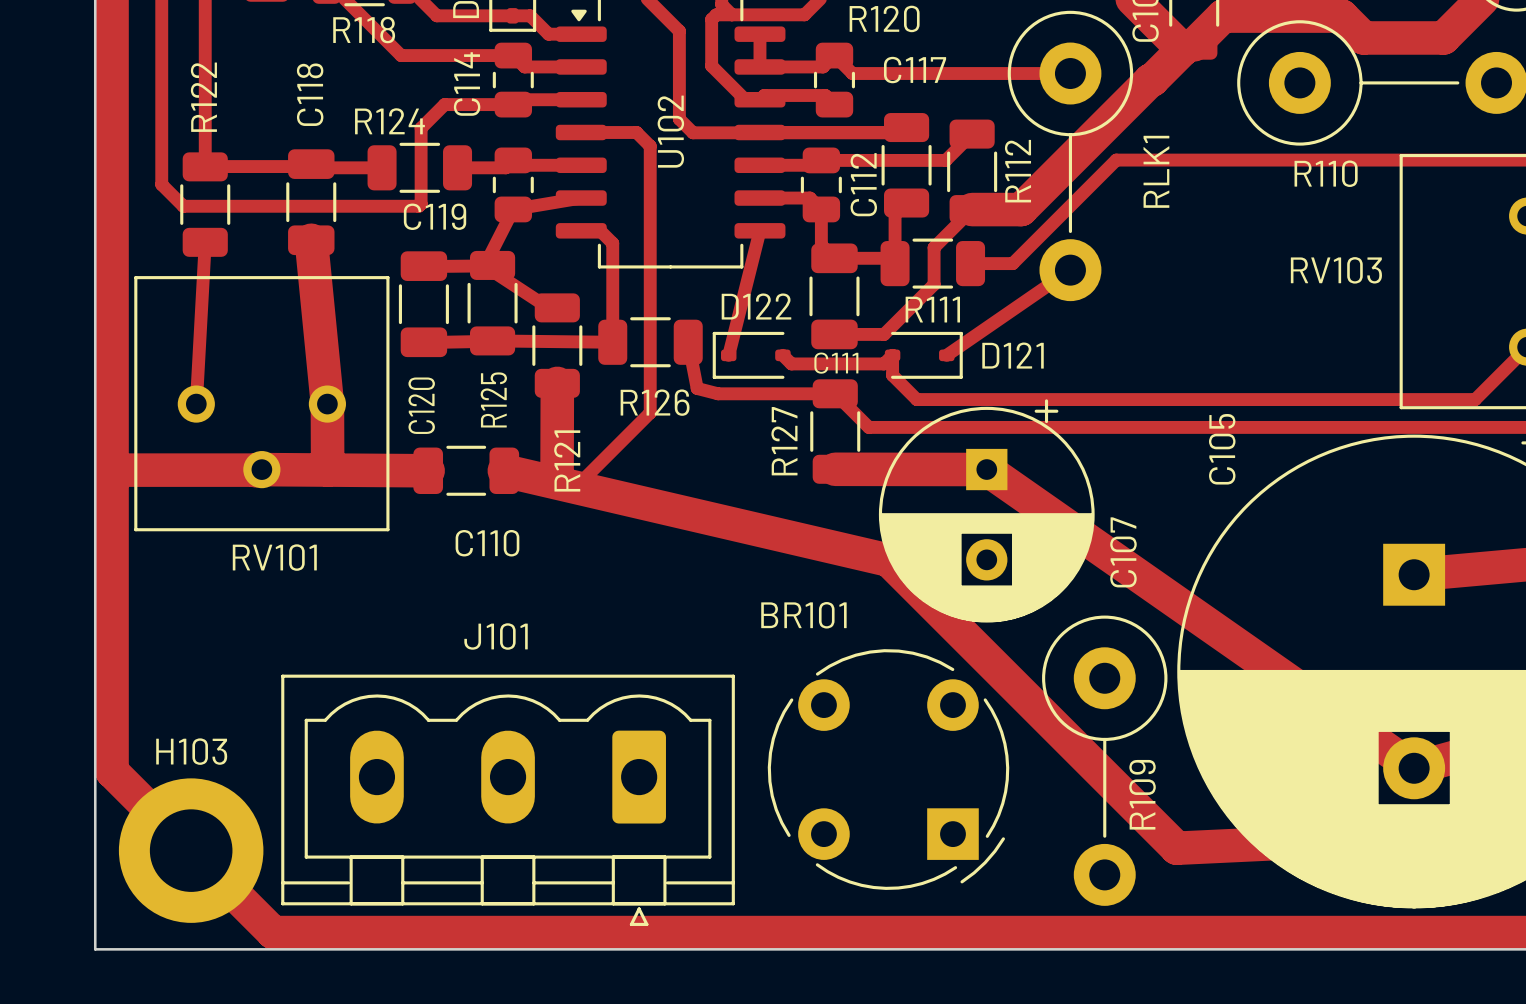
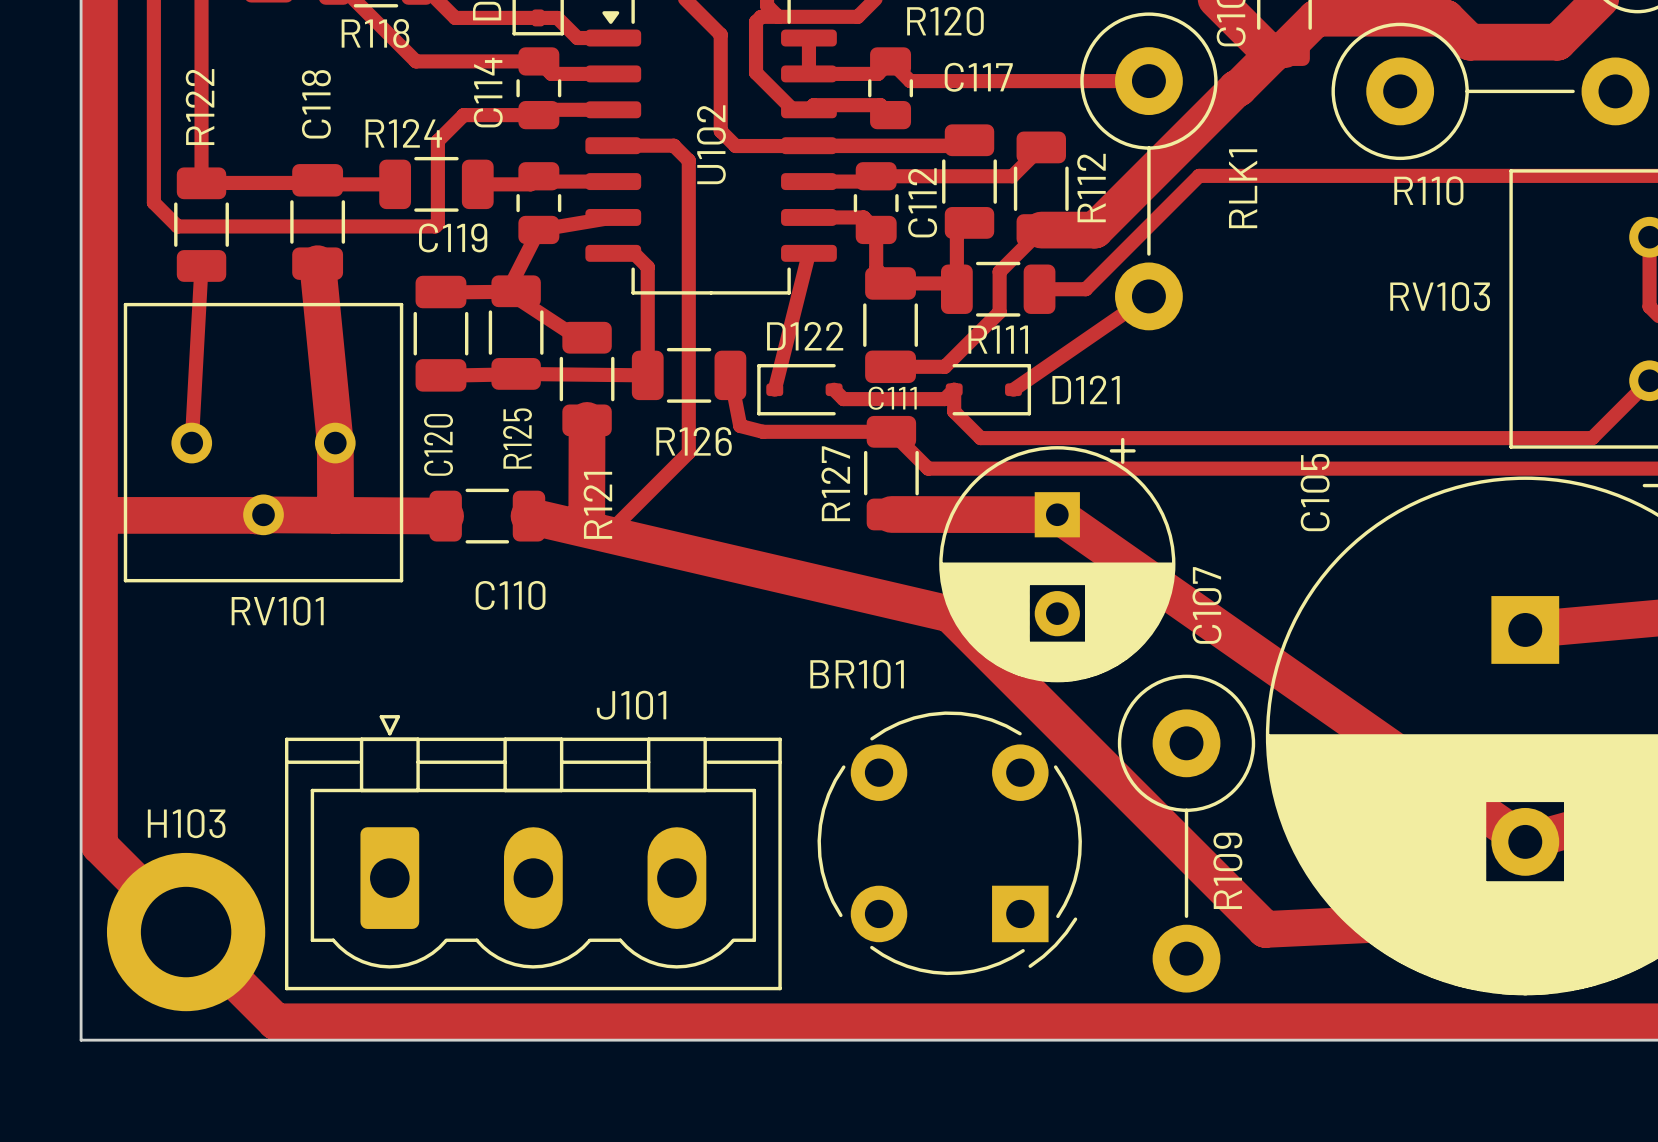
J101 name position: J101 (496, 636) -> J101 (631, 705)
J101 rotation: 0° (508, 800) -> 180° (533, 852)

